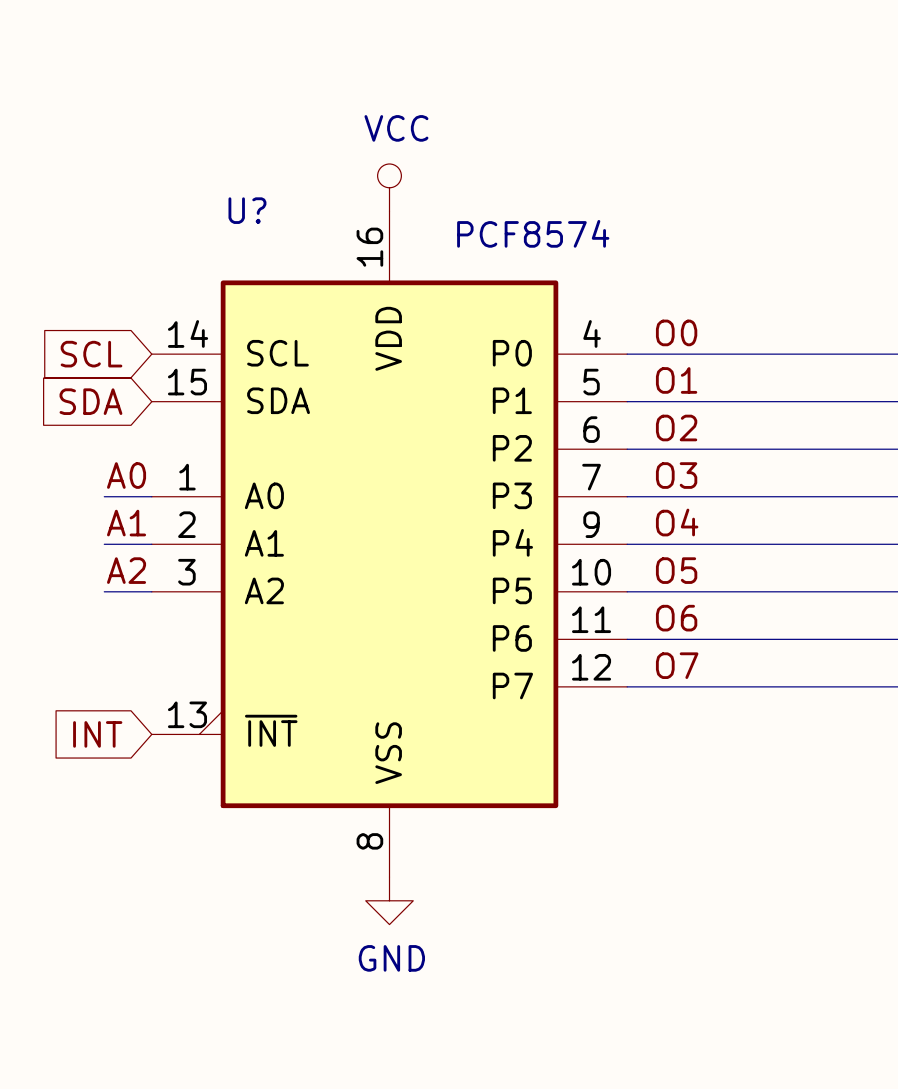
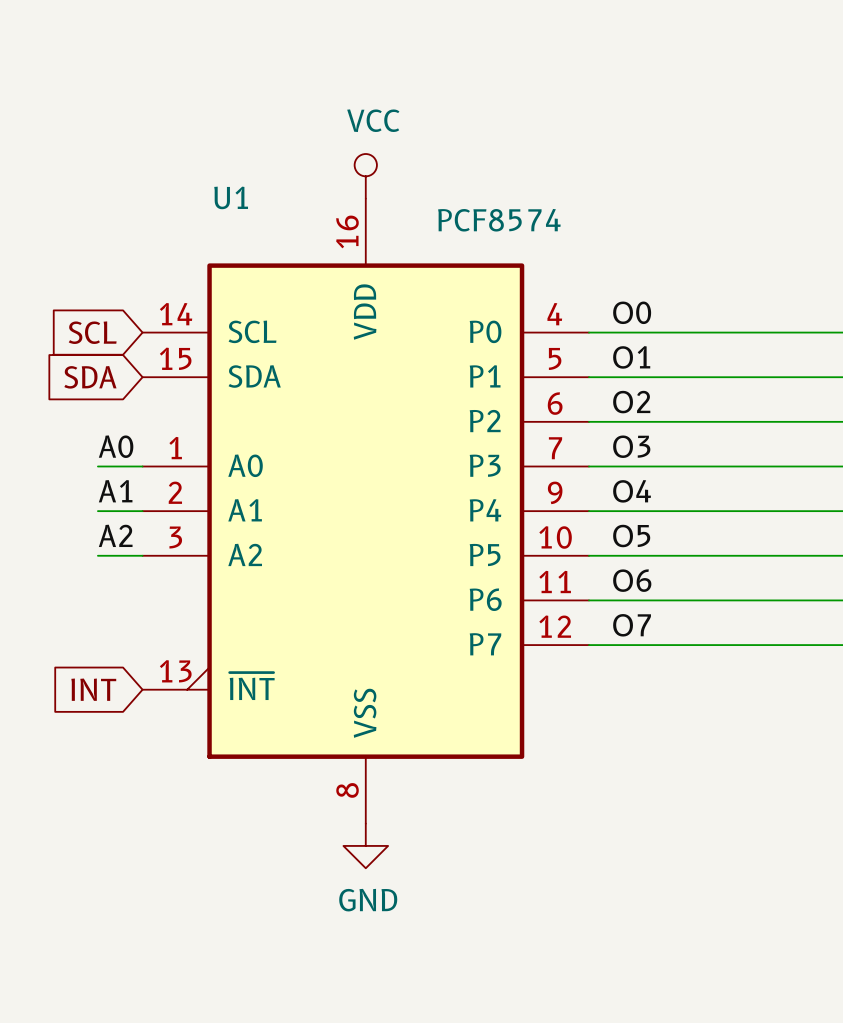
U? name: U? (247, 210) -> U1 (231, 197)

